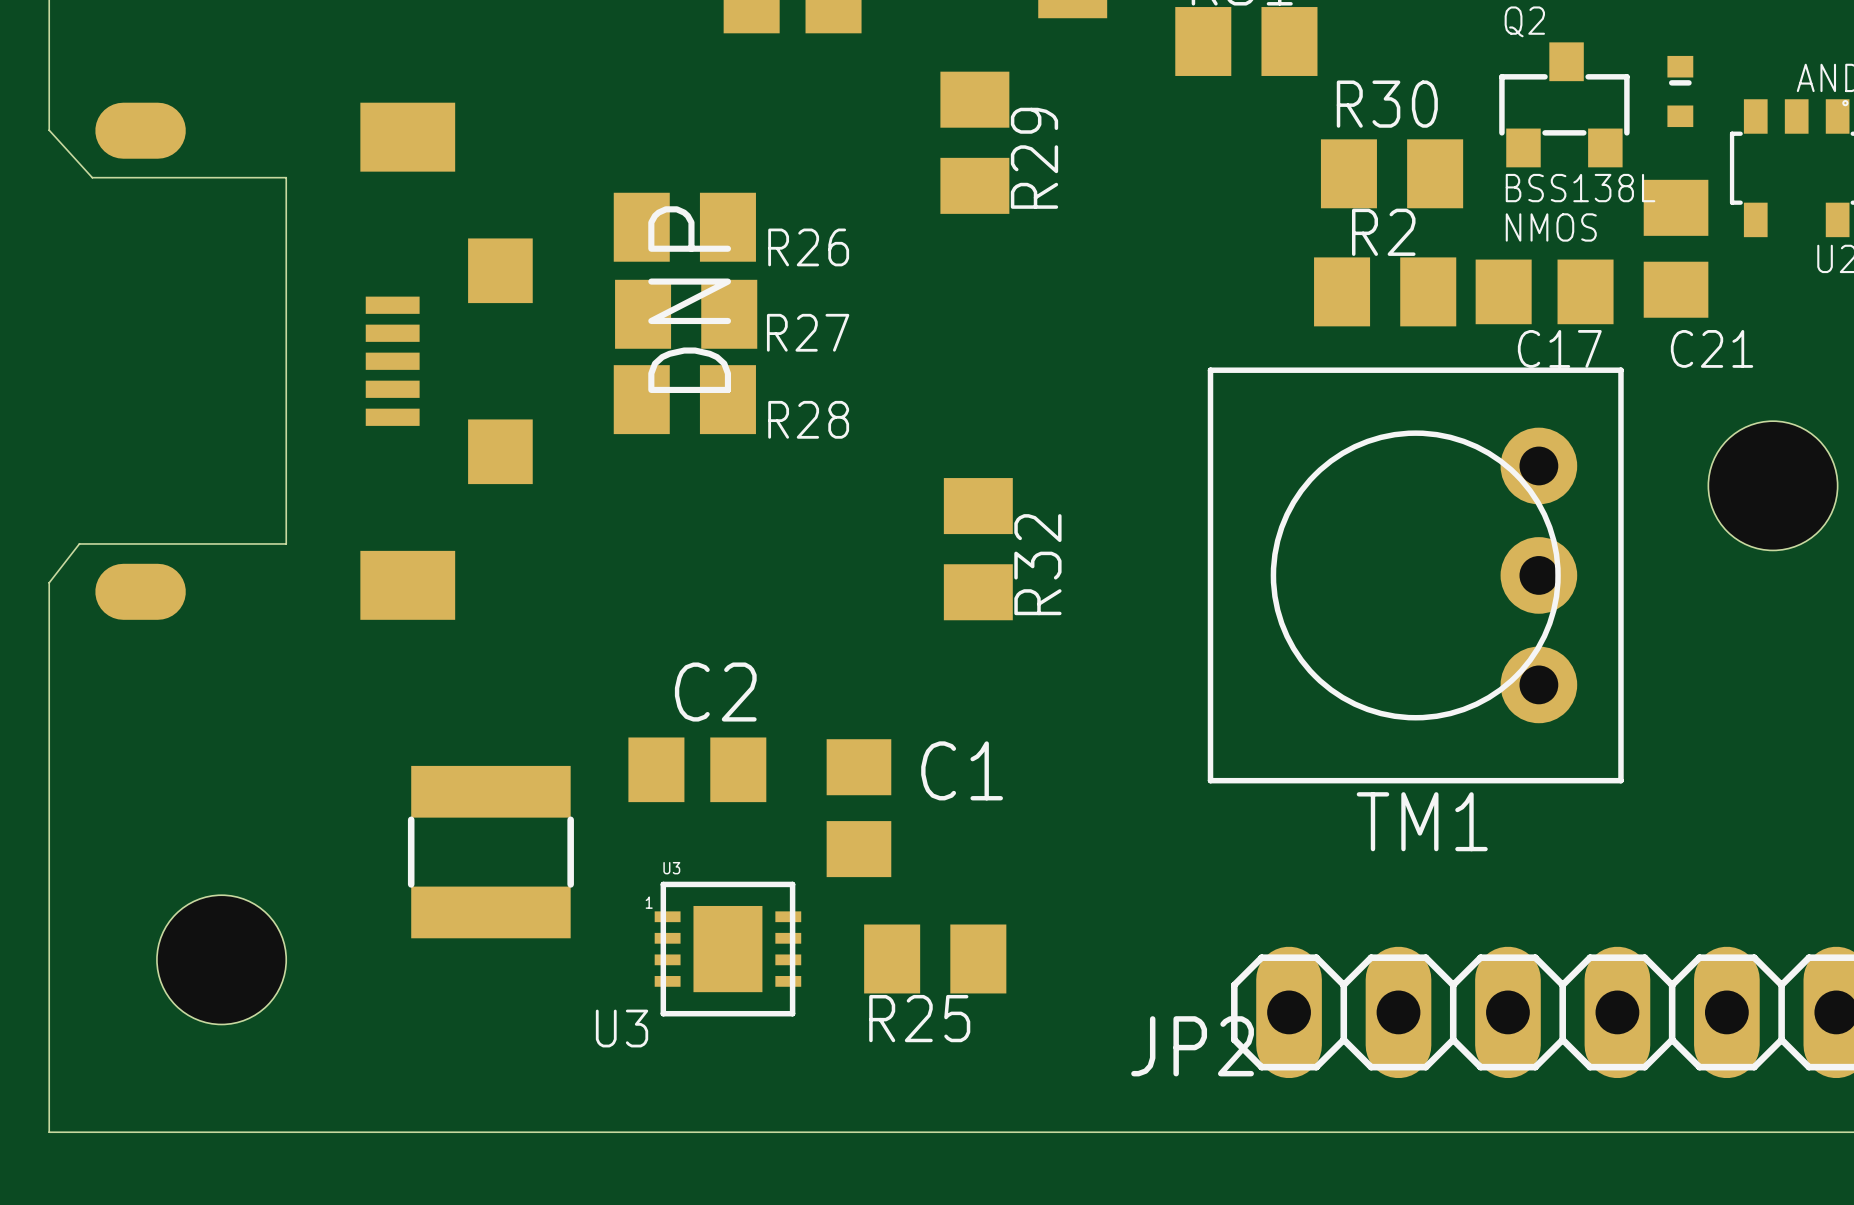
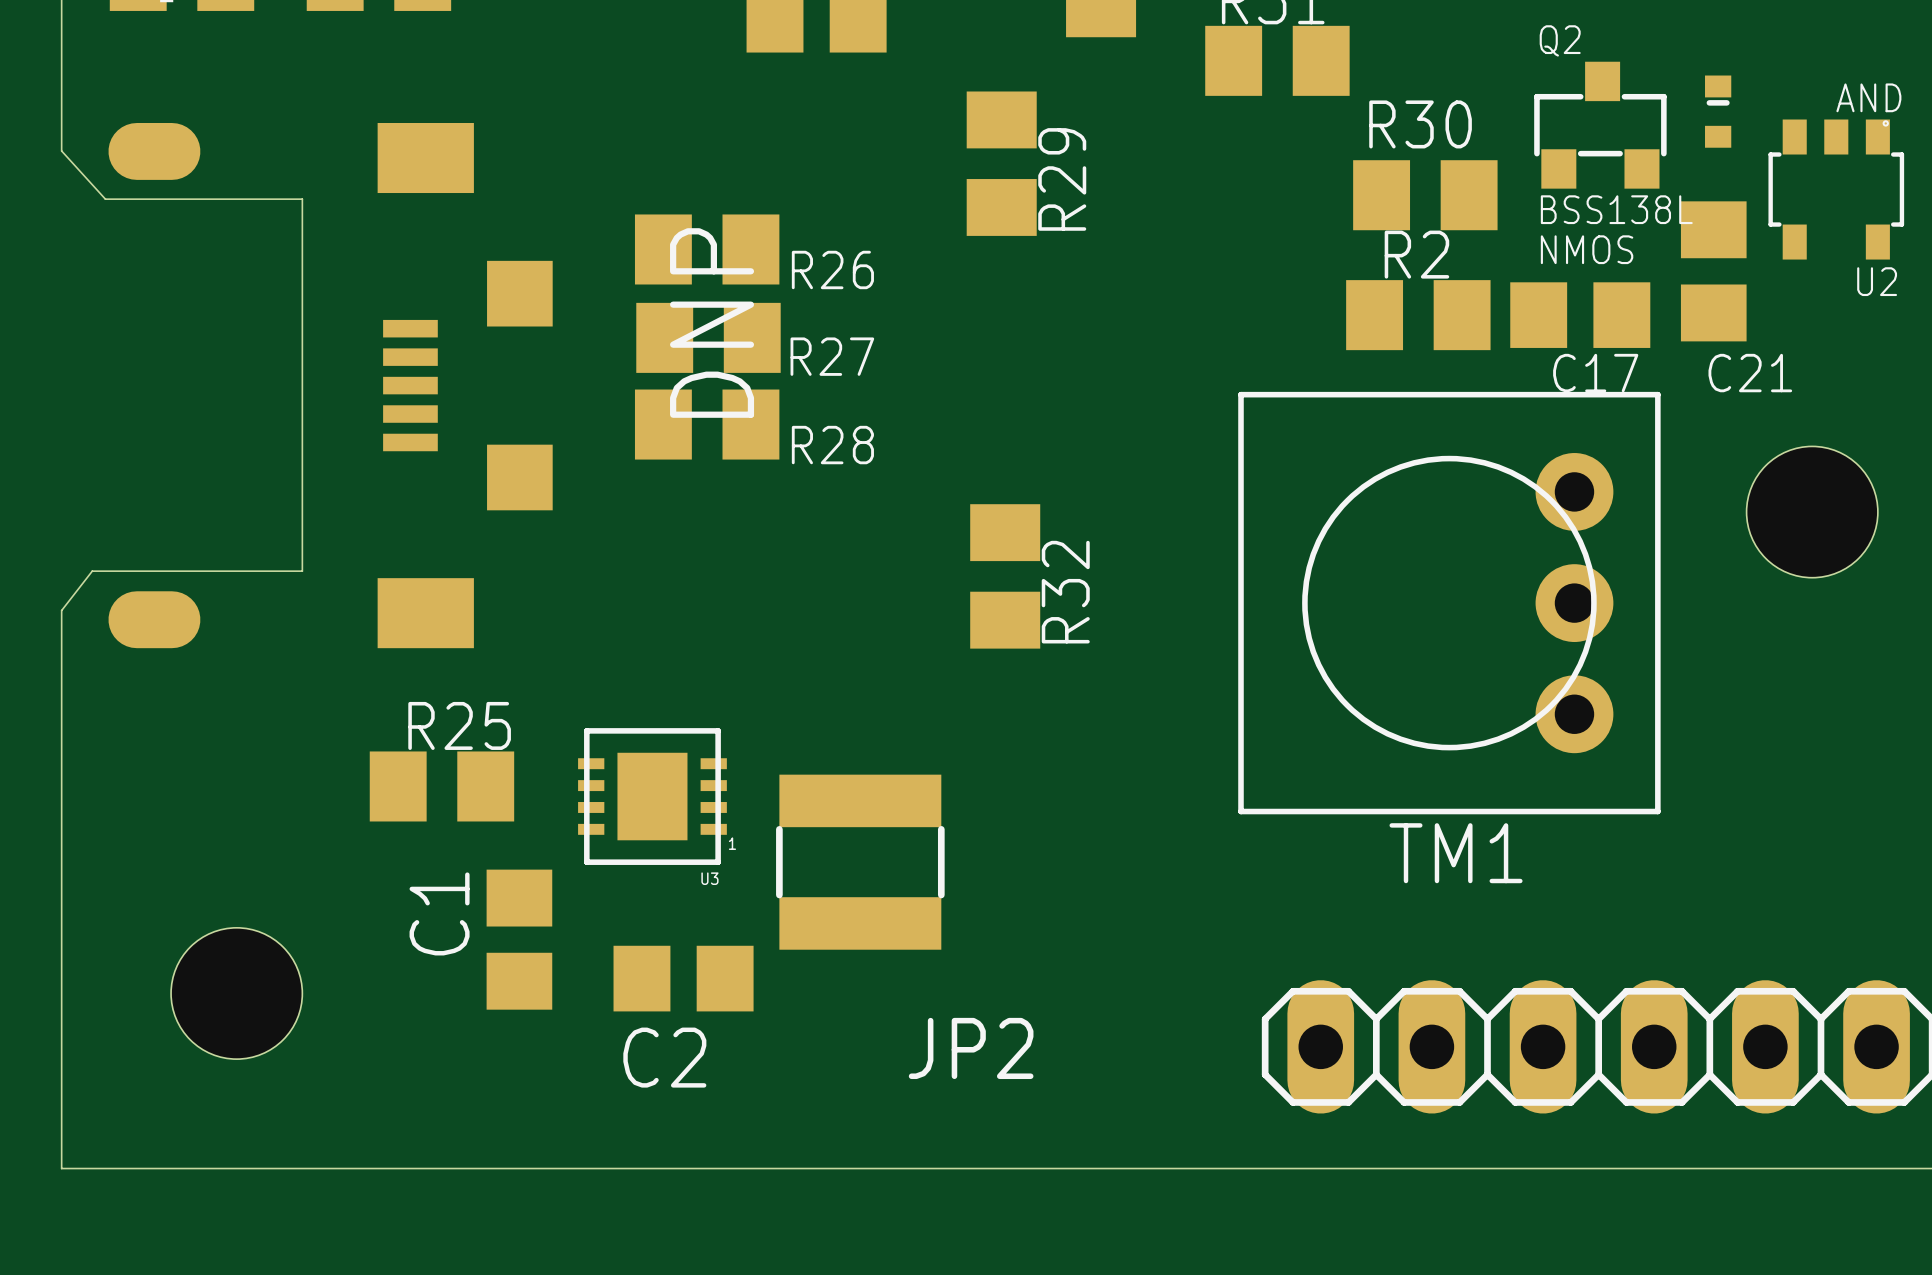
C2 name position: C2 (715, 692) -> C2 (664, 1057)
C2 position: (697, 769) -> (683, 978)
C1 name rotation: 0° (962, 770) -> 90° counterclockwise (439, 913)
C1 name position: C1 (962, 770) -> C1 (439, 913)
C1 position: (858, 808) -> (519, 939)
part position: (490, 852) -> (860, 862)
U3 rotation: 0° (727, 949) -> 180° (652, 796)
U3 position: (727, 949) -> (652, 796)
R25 position: (935, 958) -> (441, 786)
R25 name position: R25 (919, 1018) -> R25 (459, 725)
text: U3 (622, 1028) -> none
JP2 name position: JP2 (1192, 1046) -> JP2 (971, 1048)

